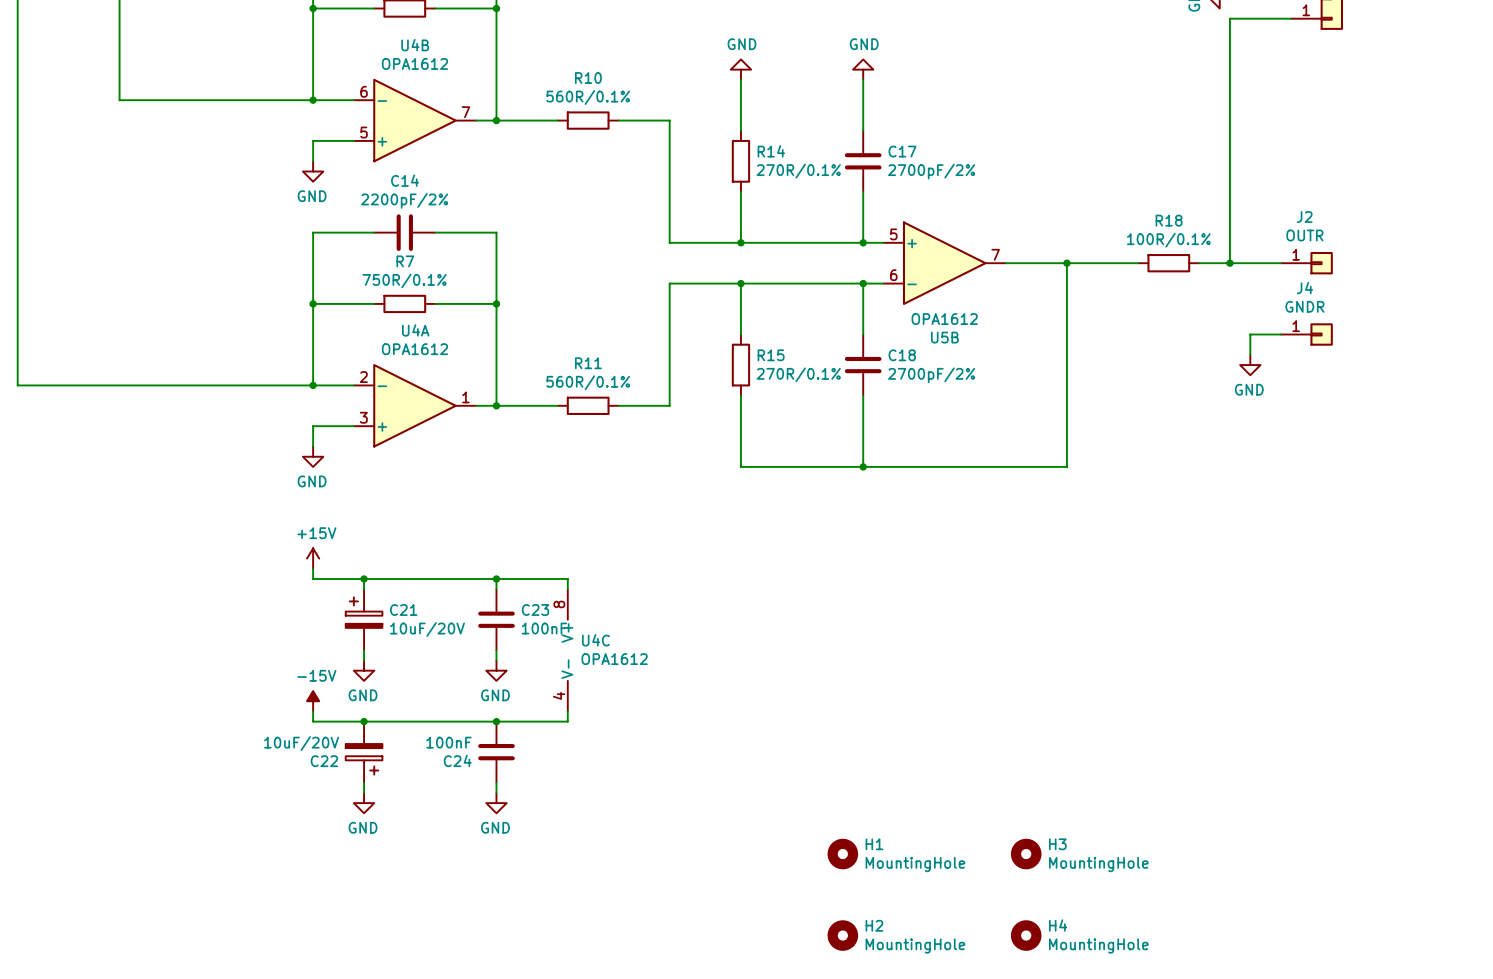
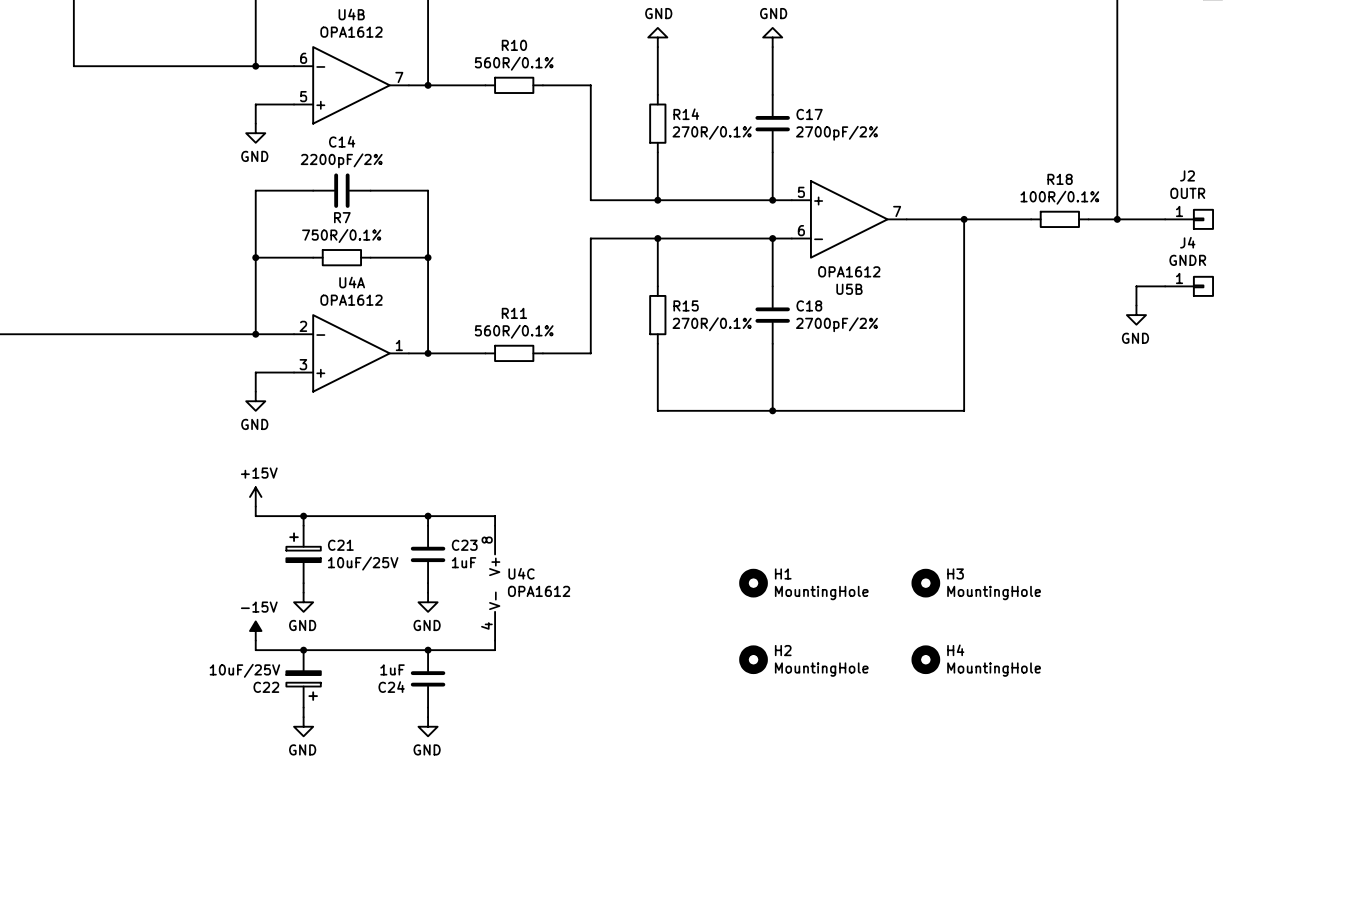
C23 value: 100nF (544, 628) -> 1uF (464, 562)
C21 value: 10uF/20V (427, 629) -> 10uF/25V (363, 563)
C24 value: 100nF (448, 742) -> 1uF (392, 669)
C22 value: 10uF/20V (301, 743) -> 10uF/25V (244, 670)
H1 position: (842, 854) -> (753, 583)
H3 position: (1026, 854) -> (925, 583)
H2 position: (842, 935) -> (753, 659)
H4 position: (1026, 935) -> (925, 659)

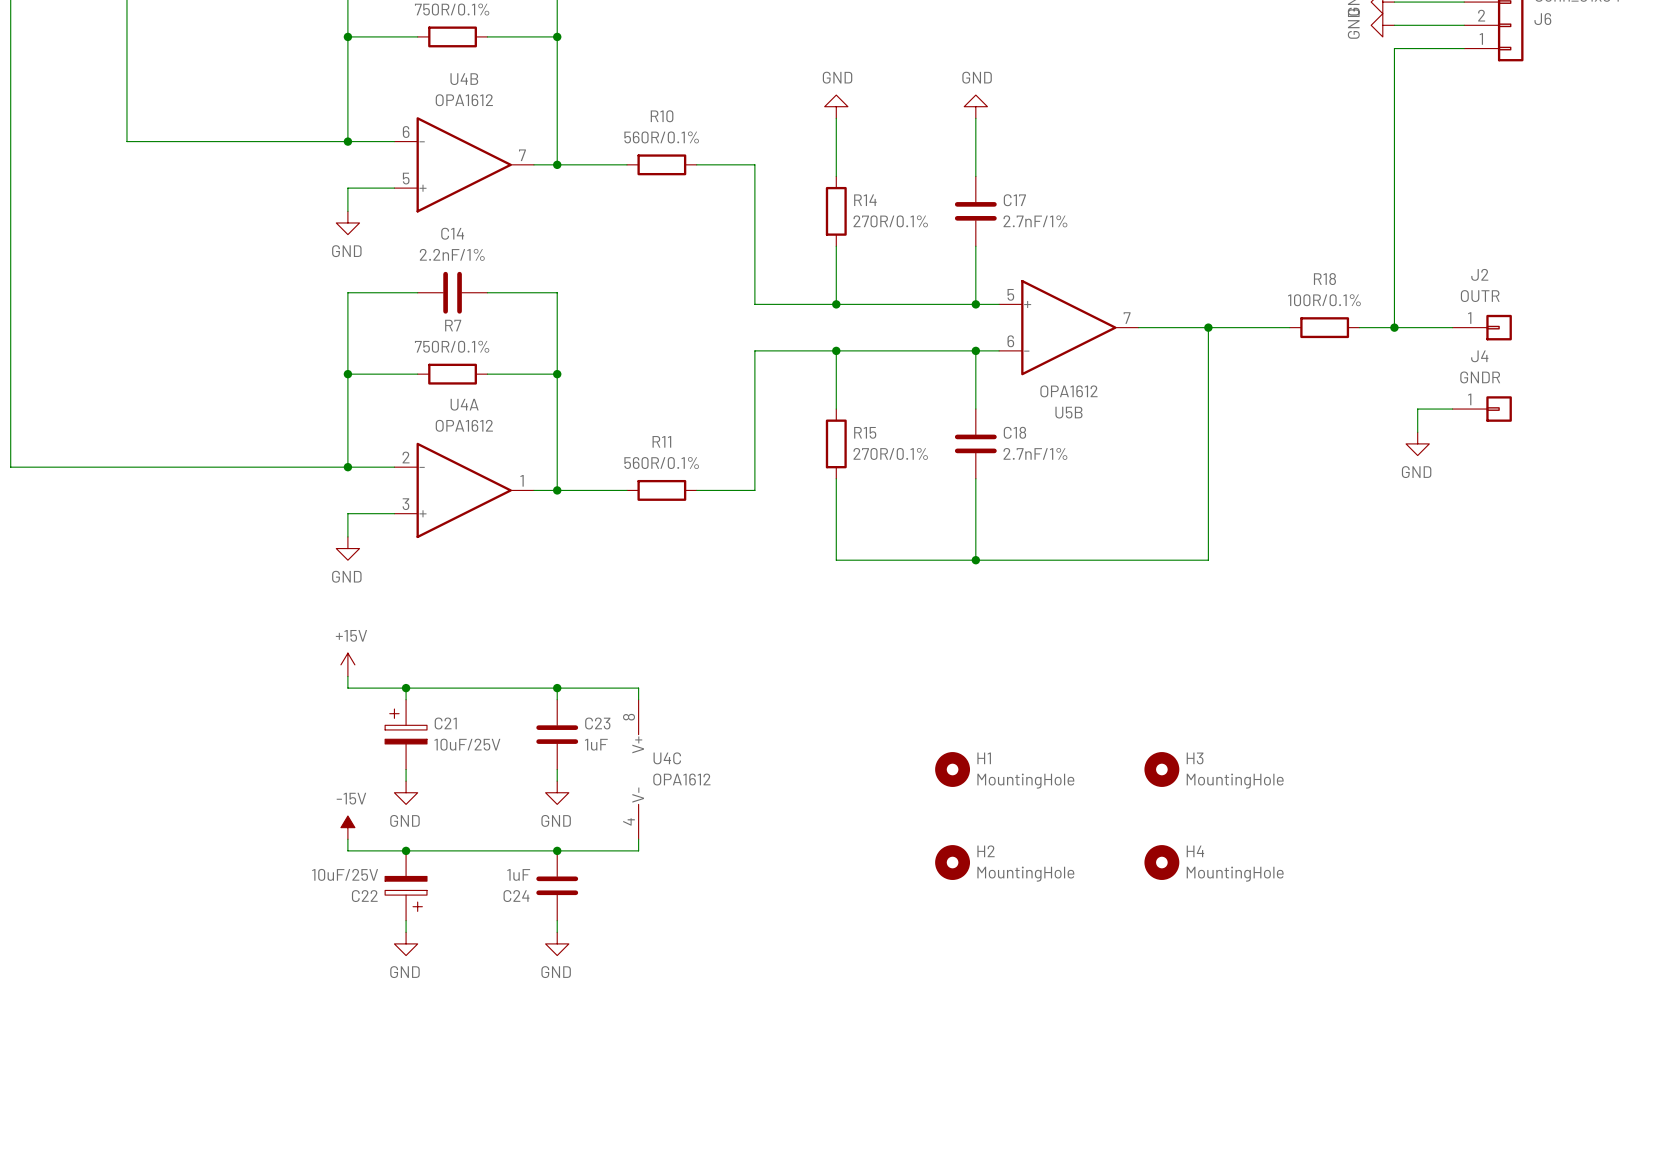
C17 value: 2700pF/2% (836, 133) -> 2.7nF/1% (1035, 221)
C14 value: 2200pF/2% (341, 160) -> 2.2nF/1% (452, 254)
C18 value: 2700pF/2% (836, 324) -> 2.7nF/1% (1035, 453)

